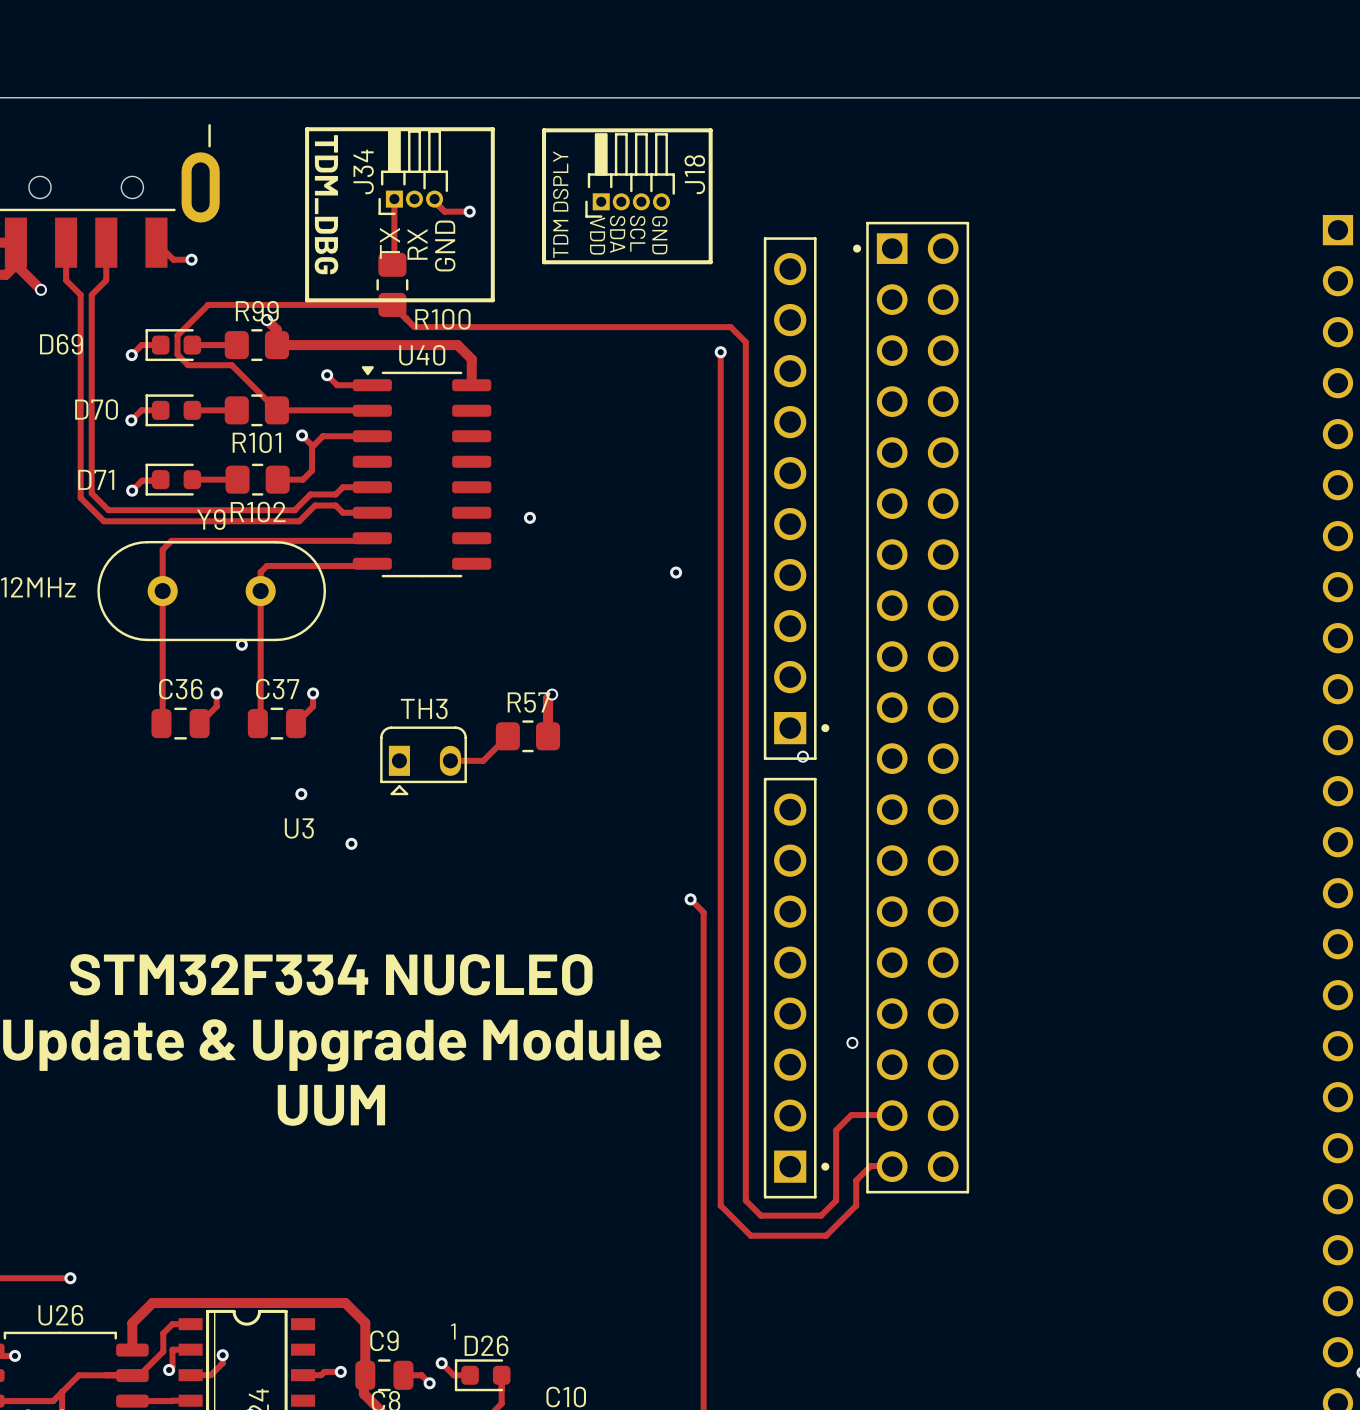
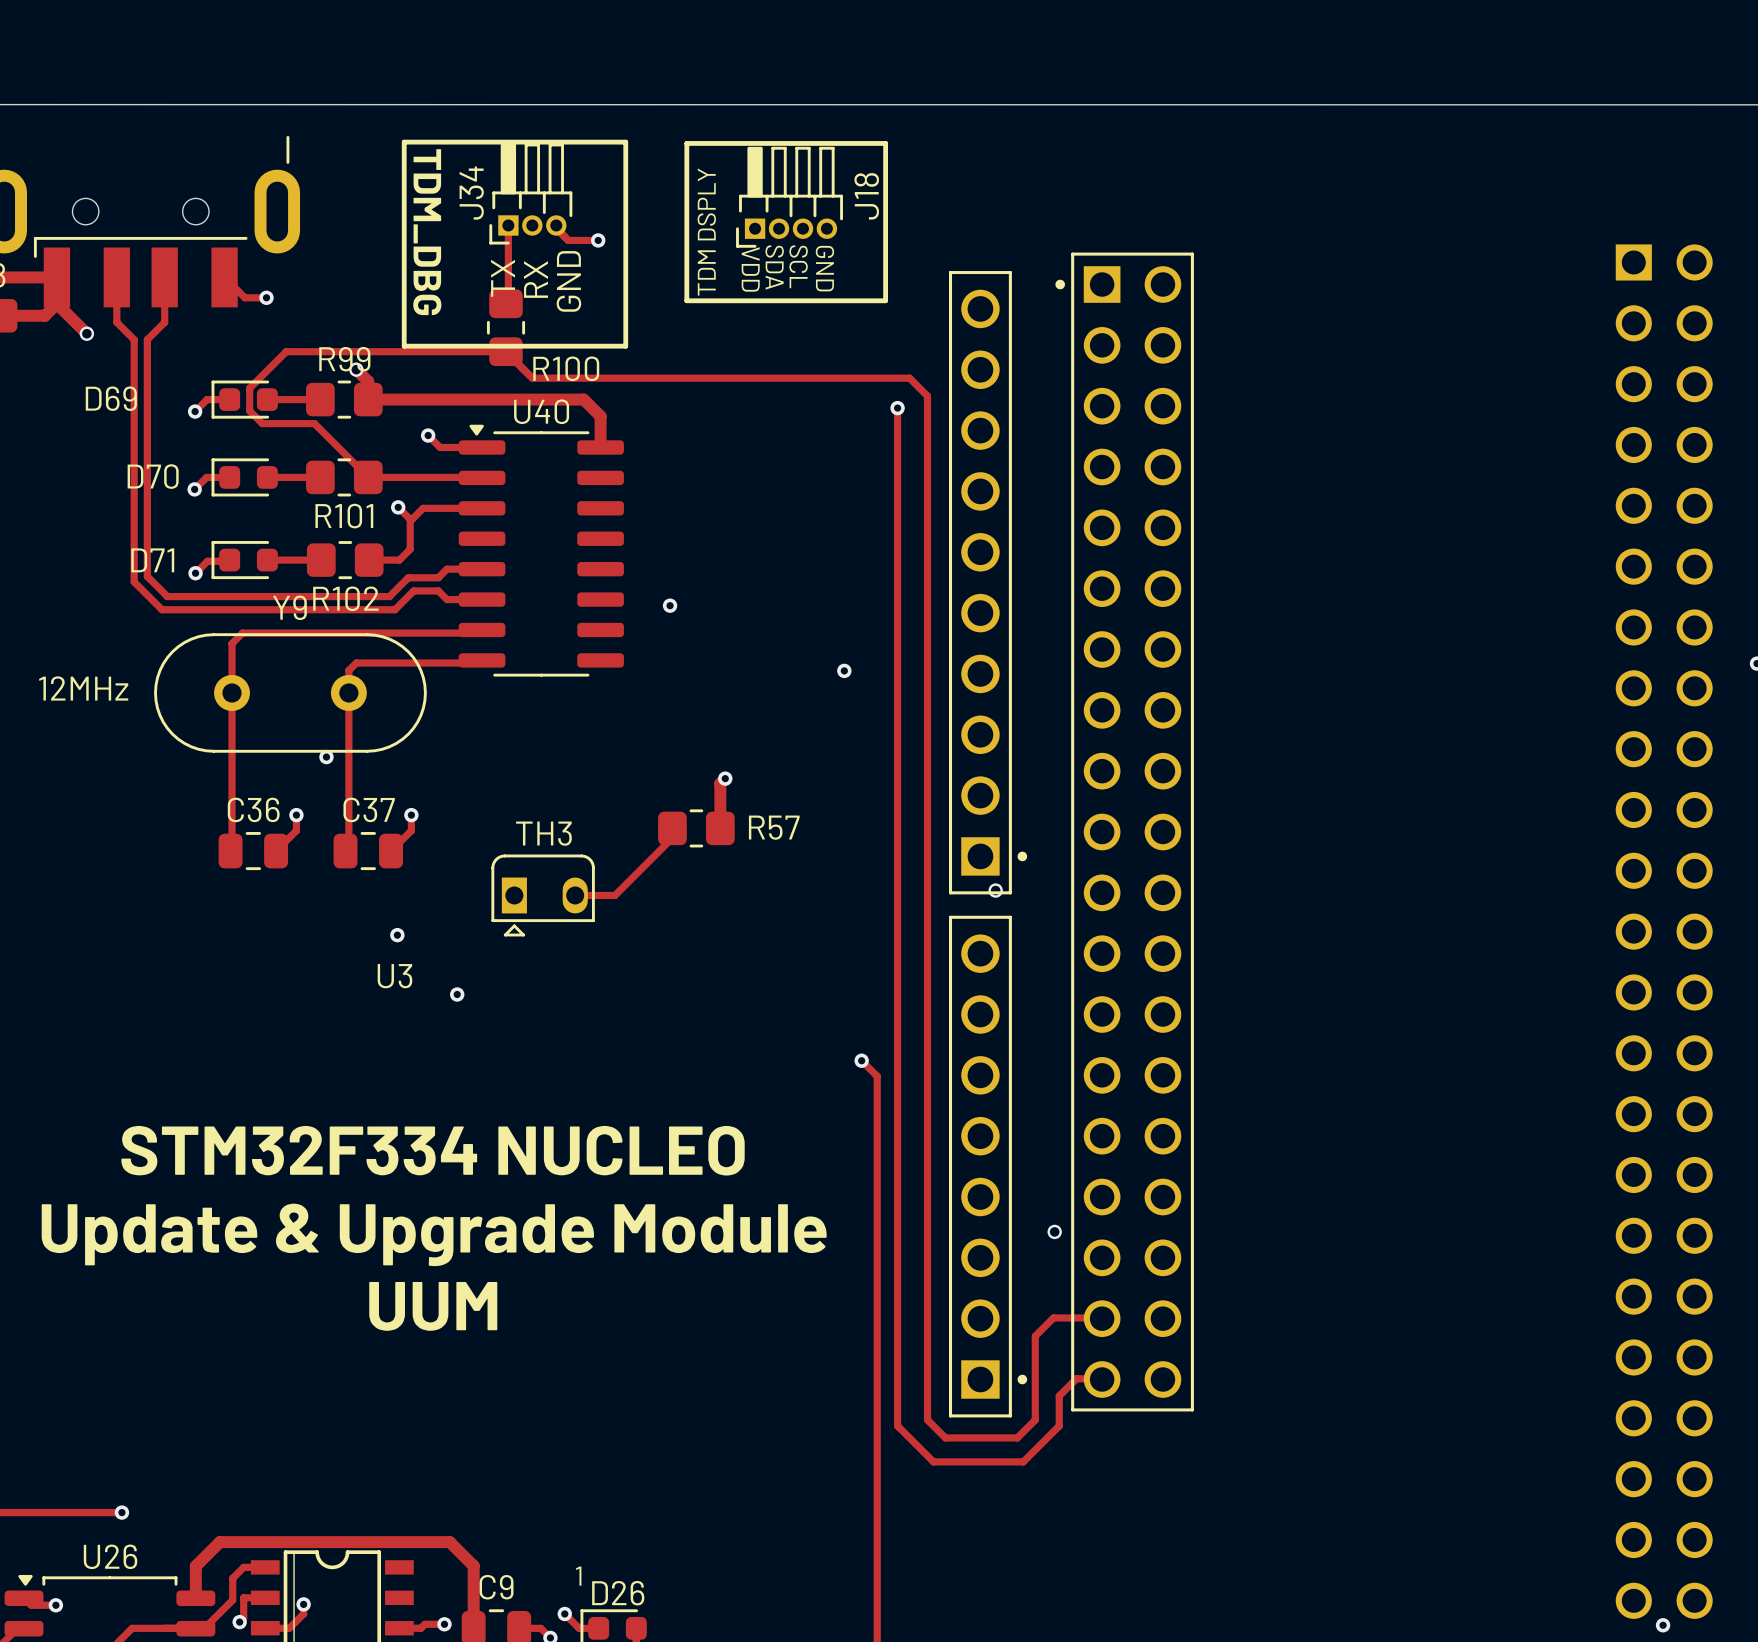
via: none -> (725, 778)
track: (552, 694) (548, 698) (548, 736) -> (725, 778) (720, 783) (720, 828)
via: (552, 694) -> none
R57 name position: R57 (528, 702) -> R57 (774, 827)
track: (507, 736) (483, 760) -> (672, 828) (672, 837) (614, 895)
R57 position: (527, 736) -> (696, 828)

